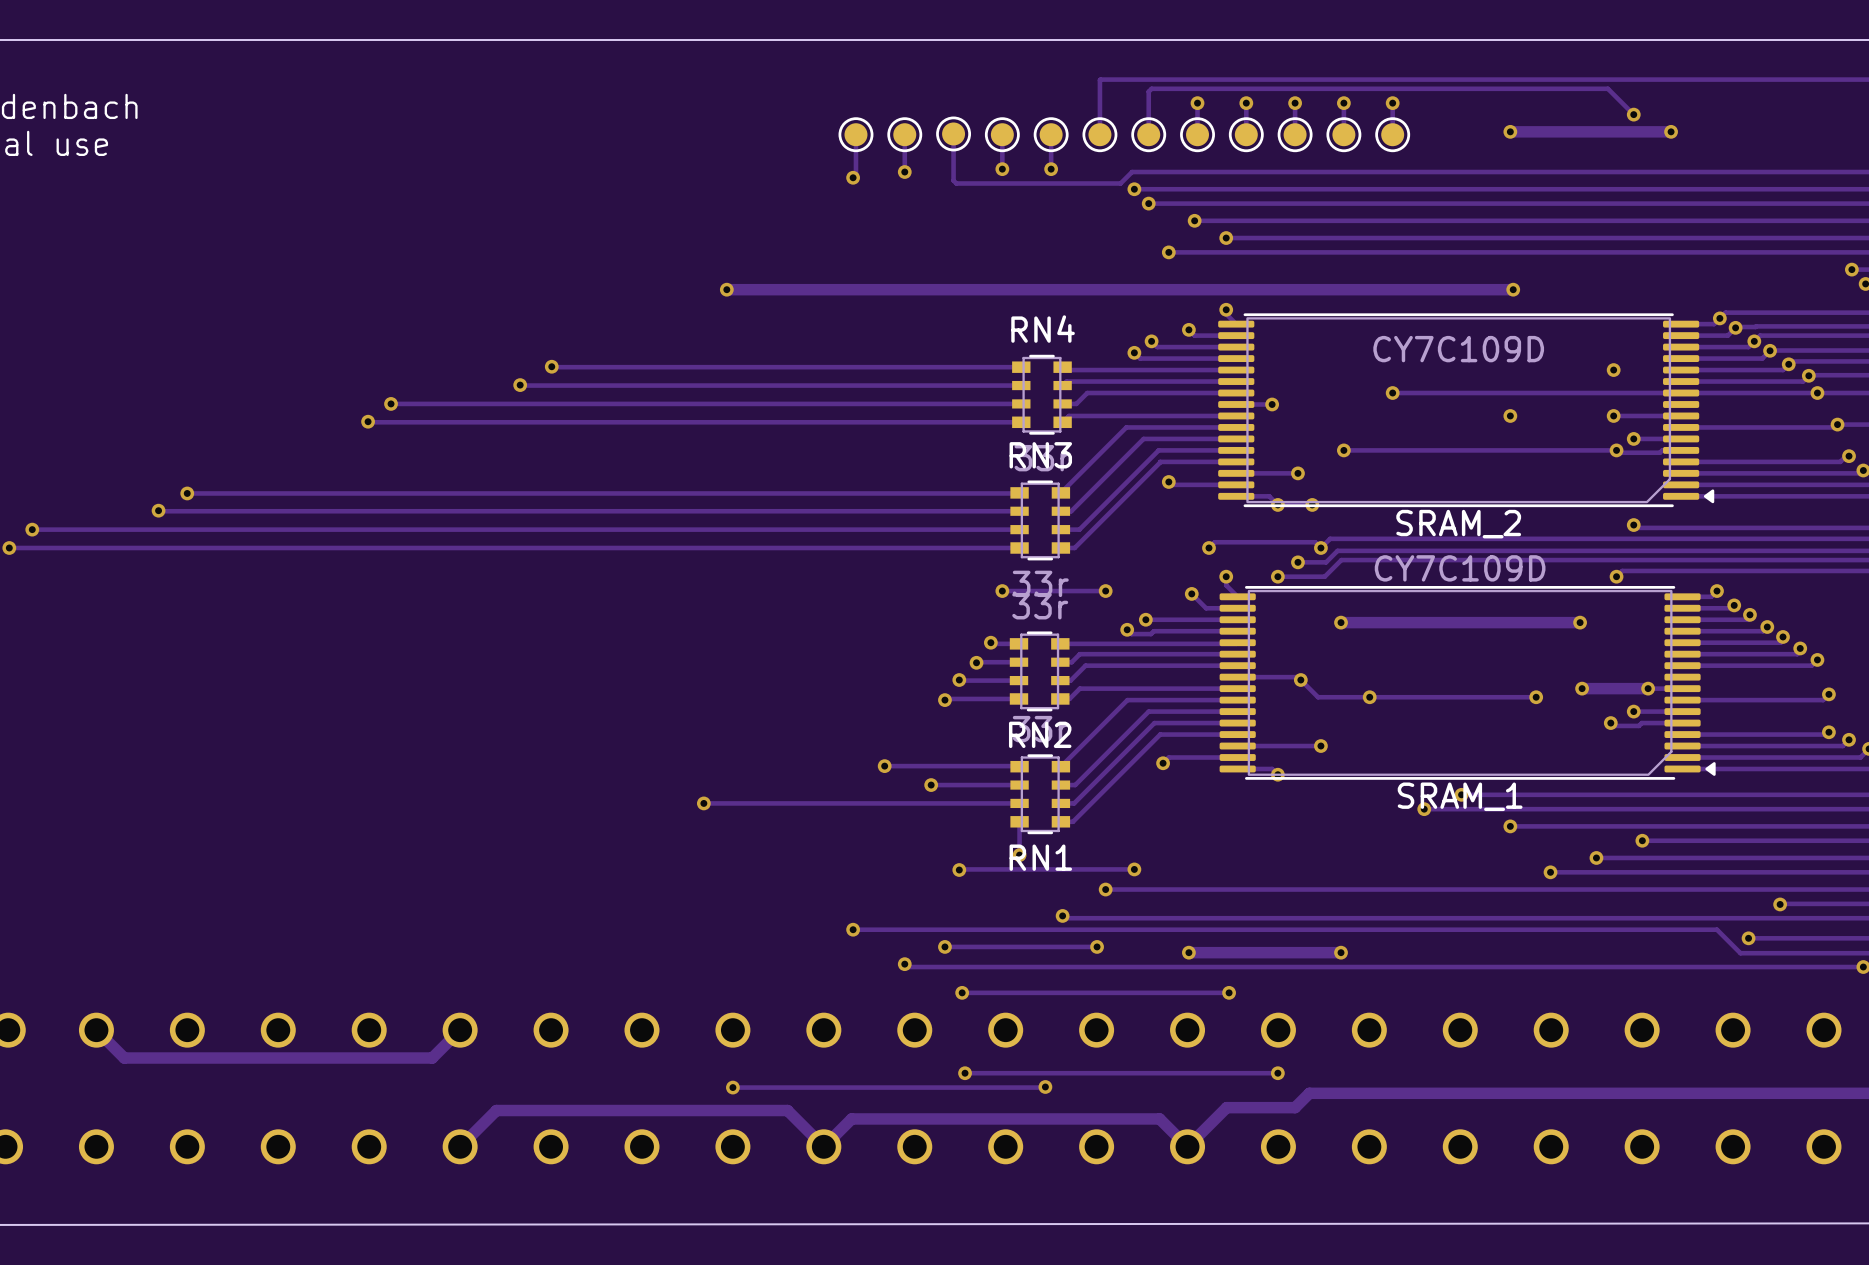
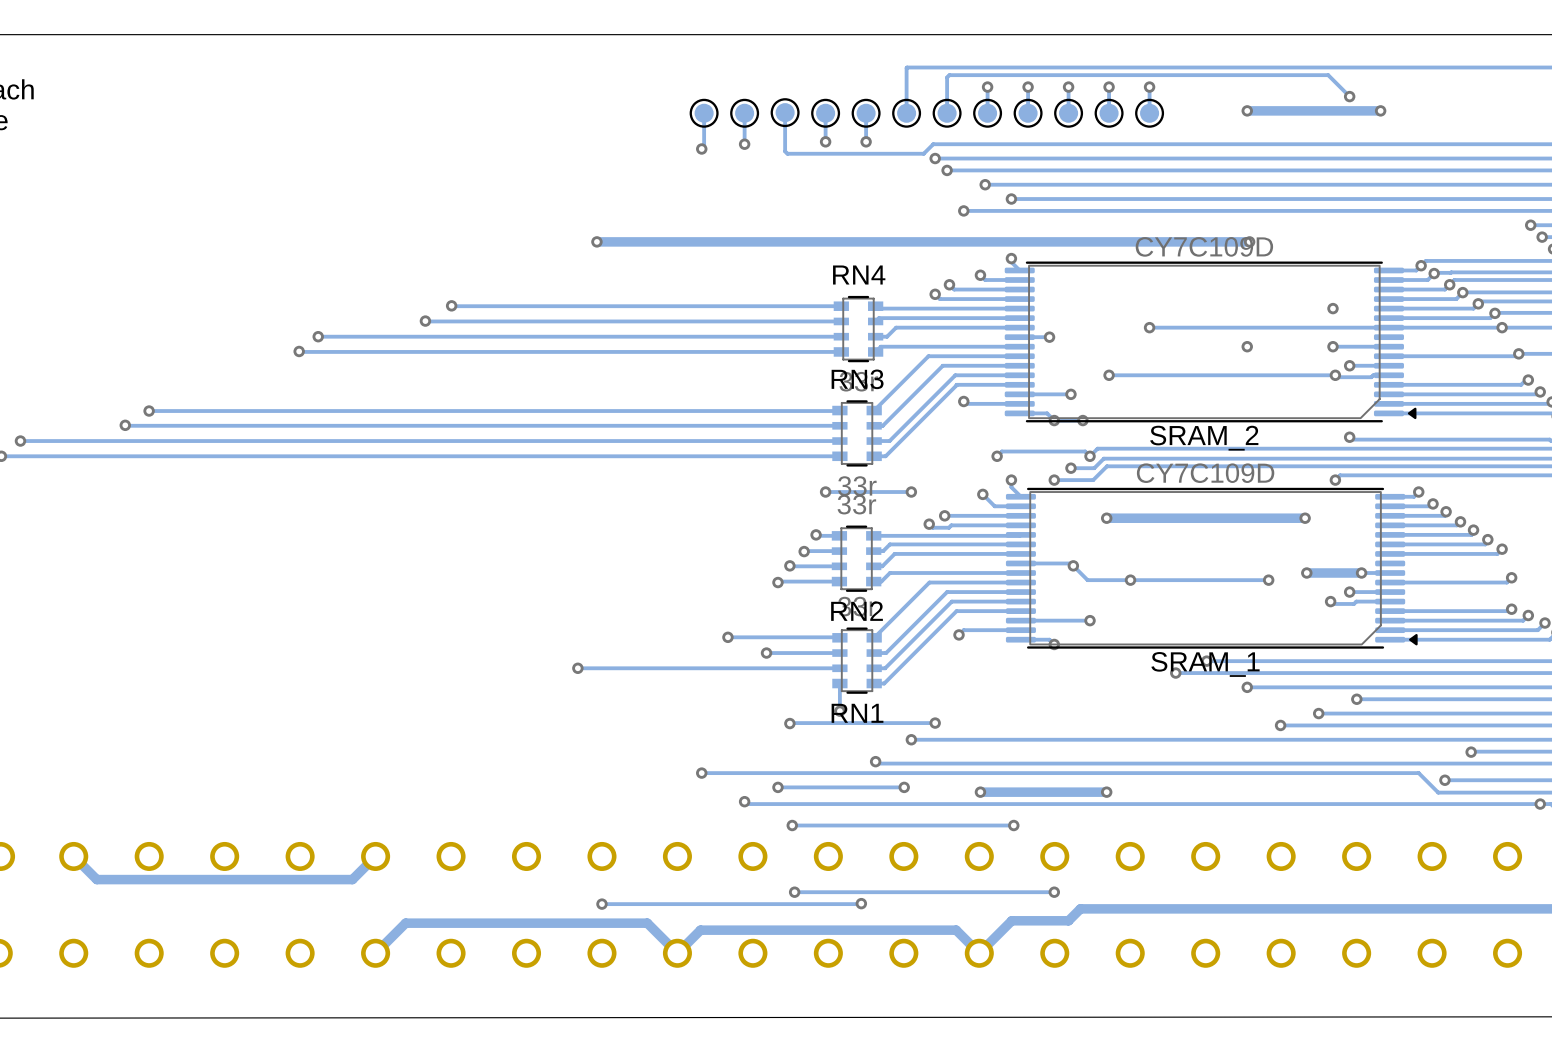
SRAM_2 value position: CY7C109D (1458, 349) -> CY7C109D (1204, 246)

